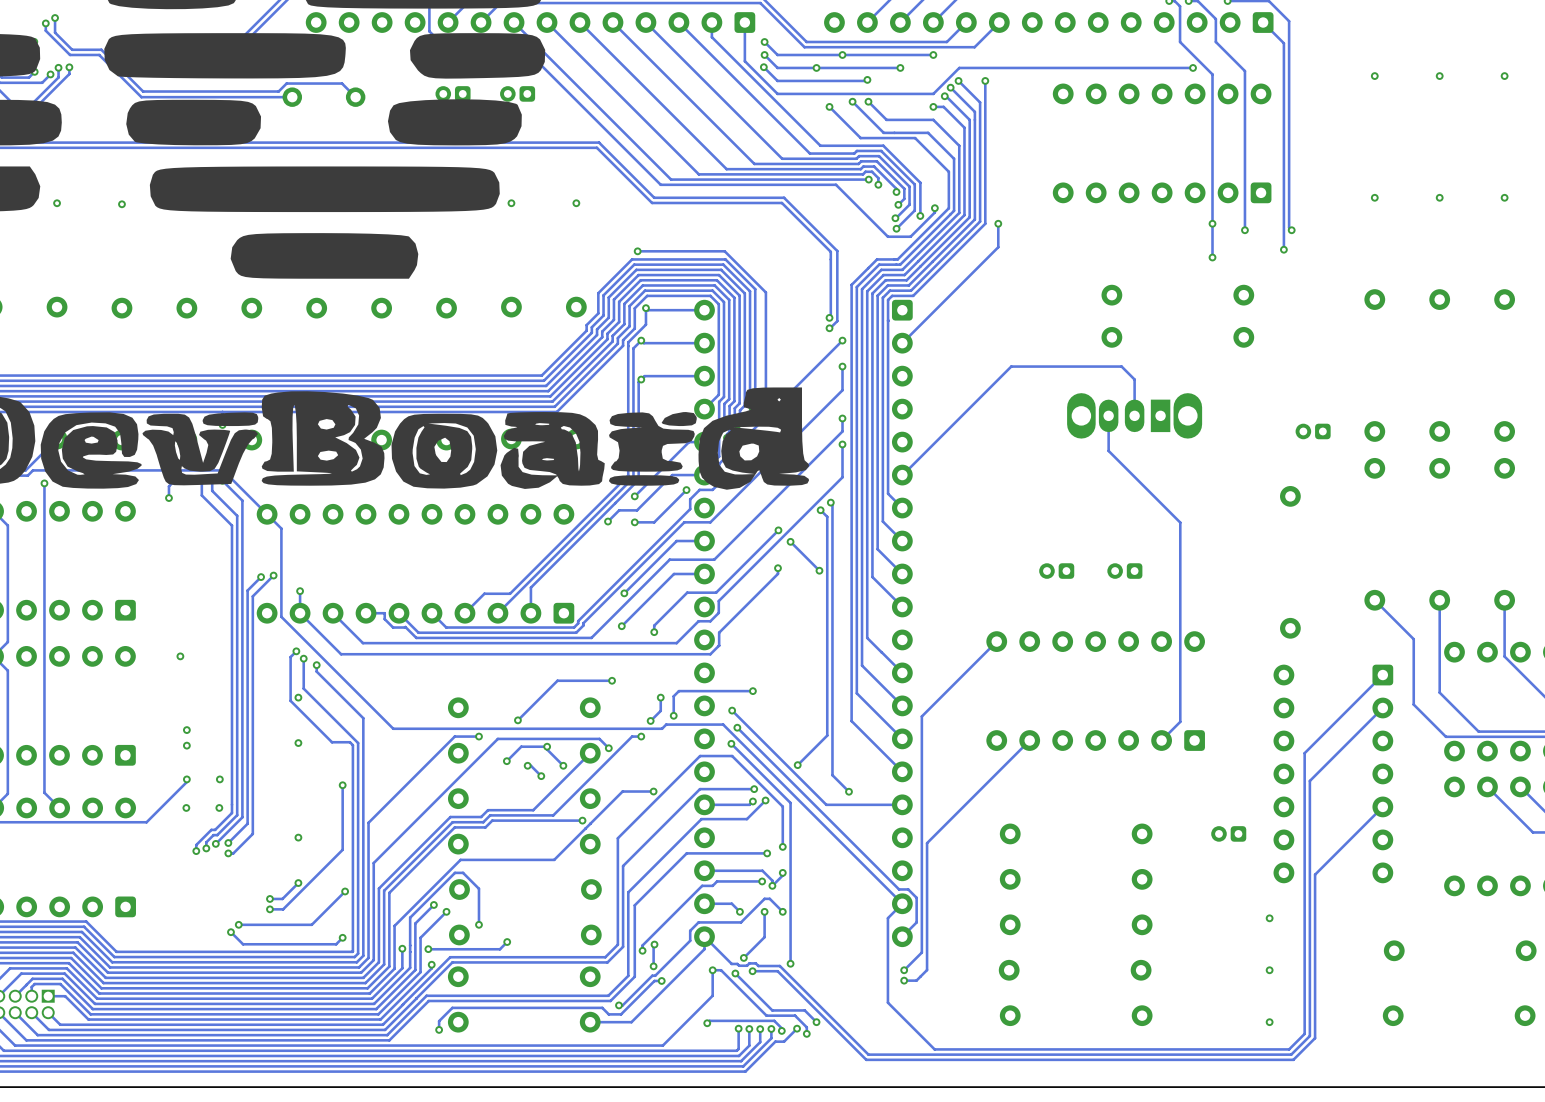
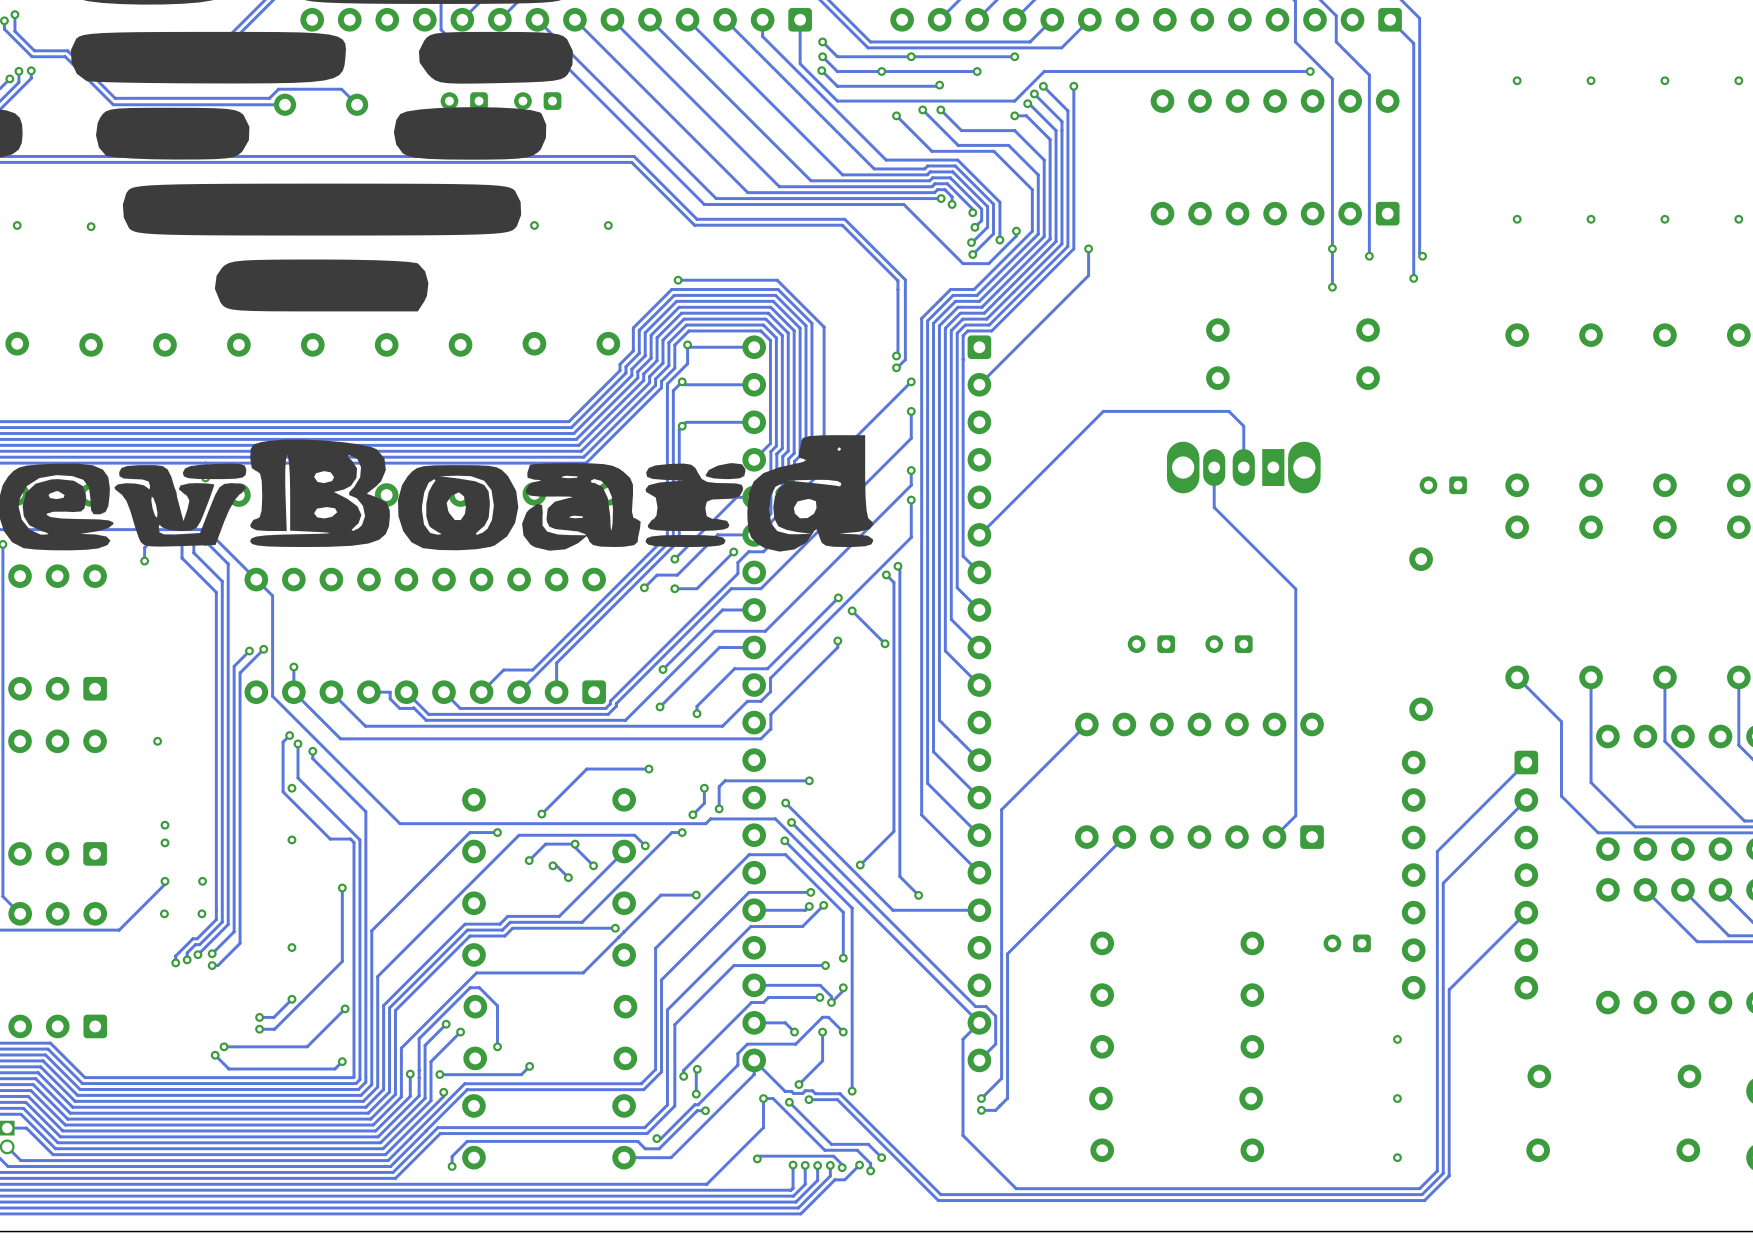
part footprint: [435, 86, 471, 102] -> [440, 92, 488, 110]
part footprint: [500, 86, 536, 102] -> [514, 92, 562, 110]
part footprint: [1295, 423, 1331, 440] -> [1419, 476, 1467, 495]
part footprint: [1039, 563, 1075, 579] -> [1127, 635, 1176, 654]
part footprint: [1107, 563, 1143, 579] -> [1205, 635, 1253, 654]
part footprint: [1211, 826, 1247, 842] -> [1323, 934, 1371, 953]

